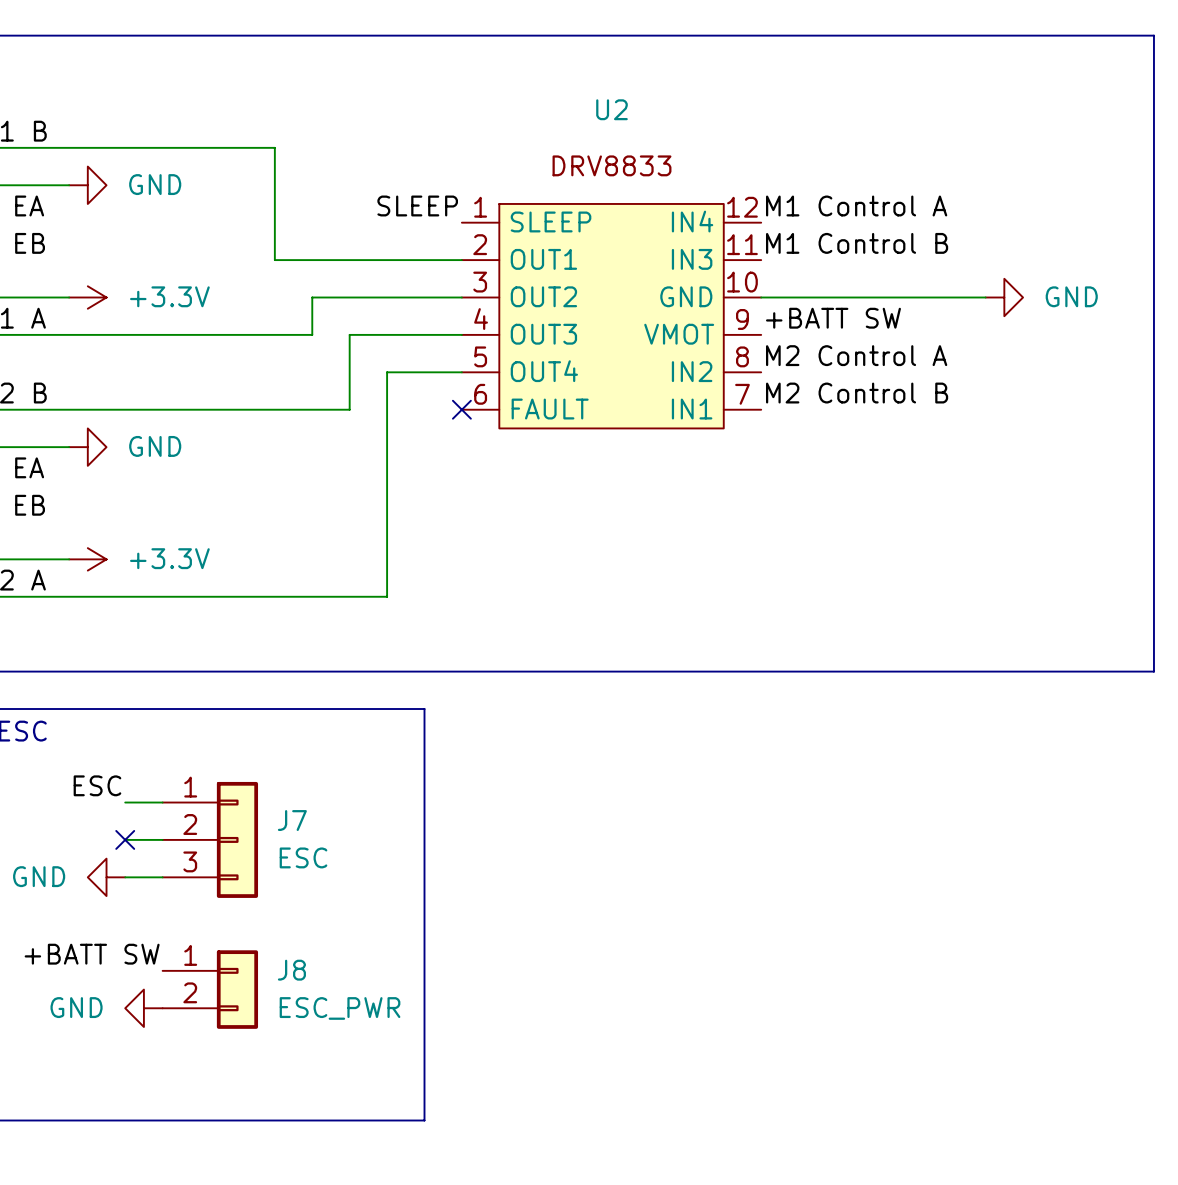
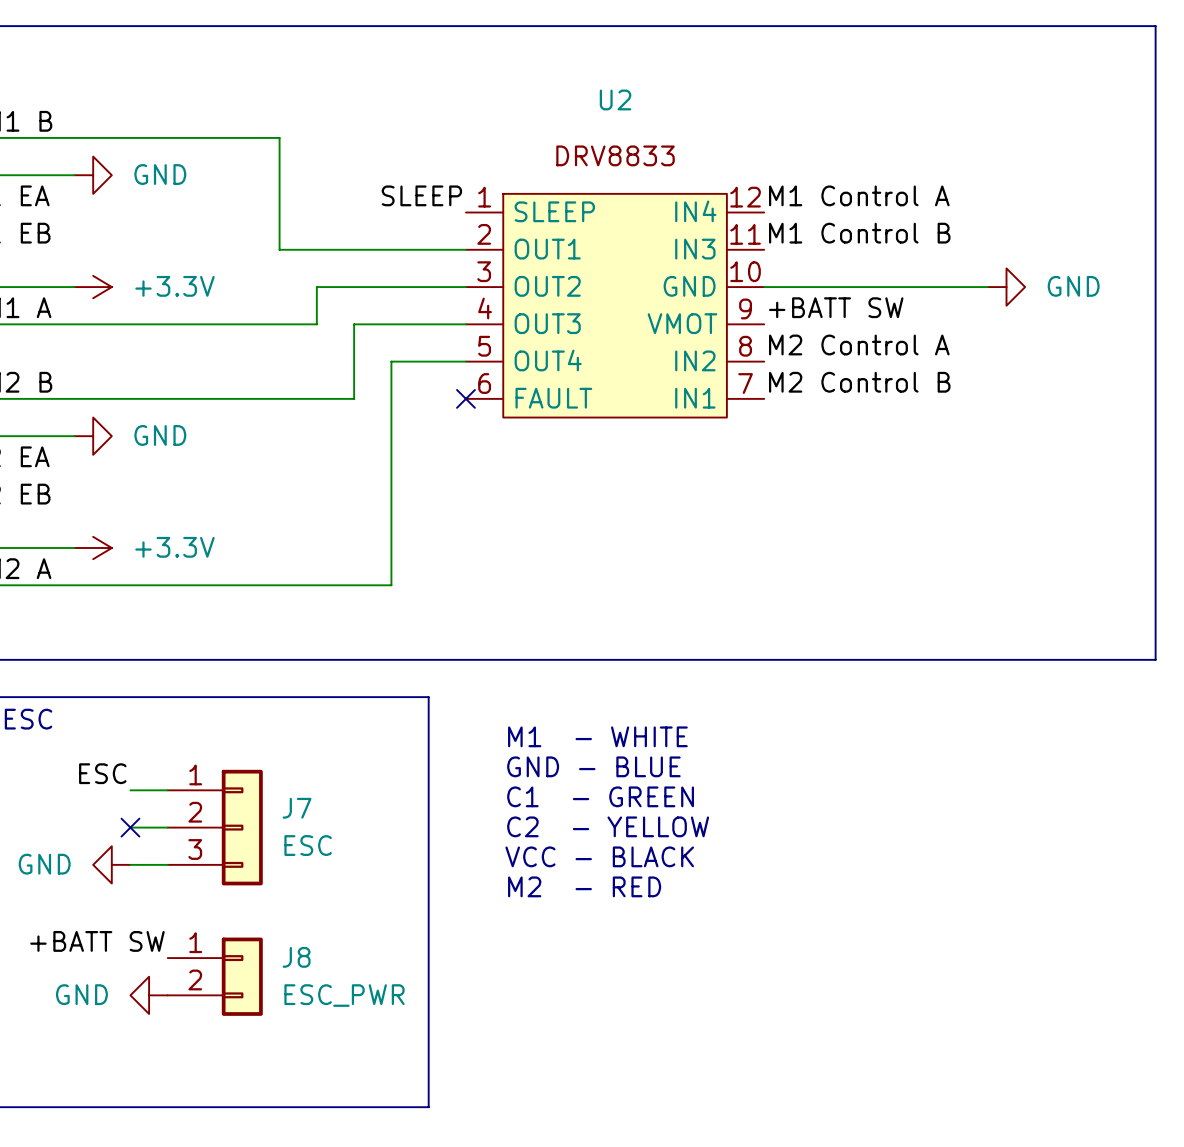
text: none -> M1 - WHITE (597, 736)
text: none -> GND - BLUE (593, 766)
text: none -> C1 - GREEN (600, 796)
text: none -> C2 - YELLOW (608, 826)
text: none -> VCC - BLACK (599, 856)
text: none -> M2 - RED (584, 886)

